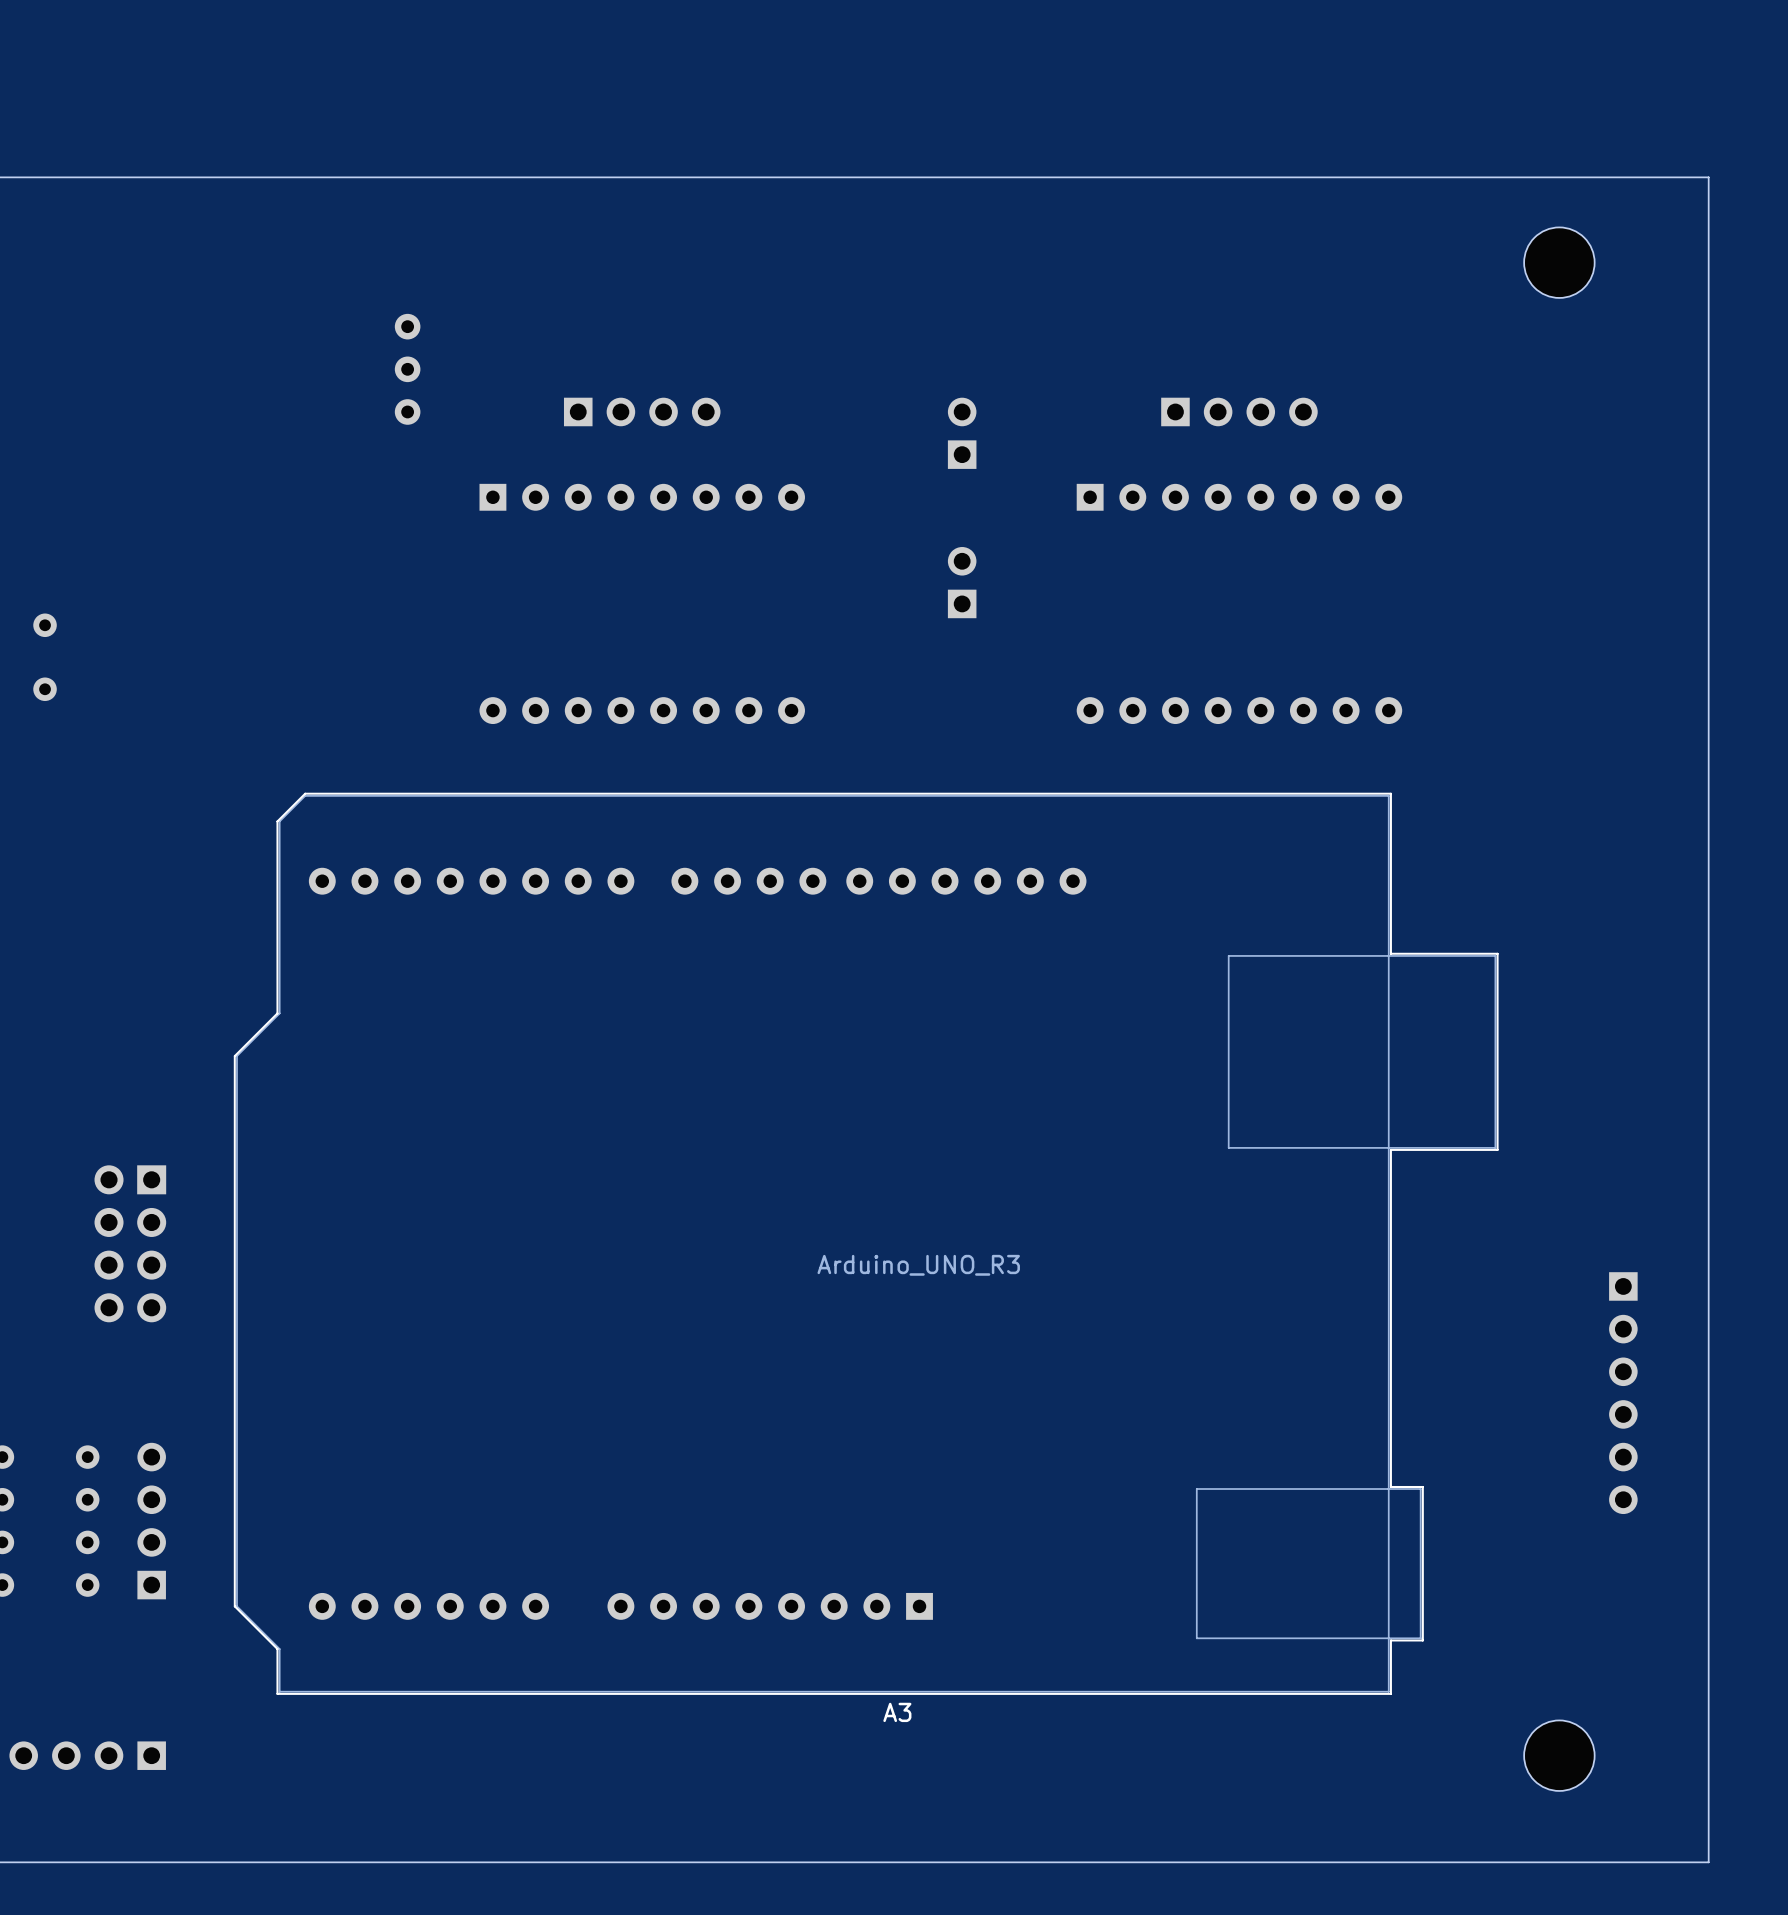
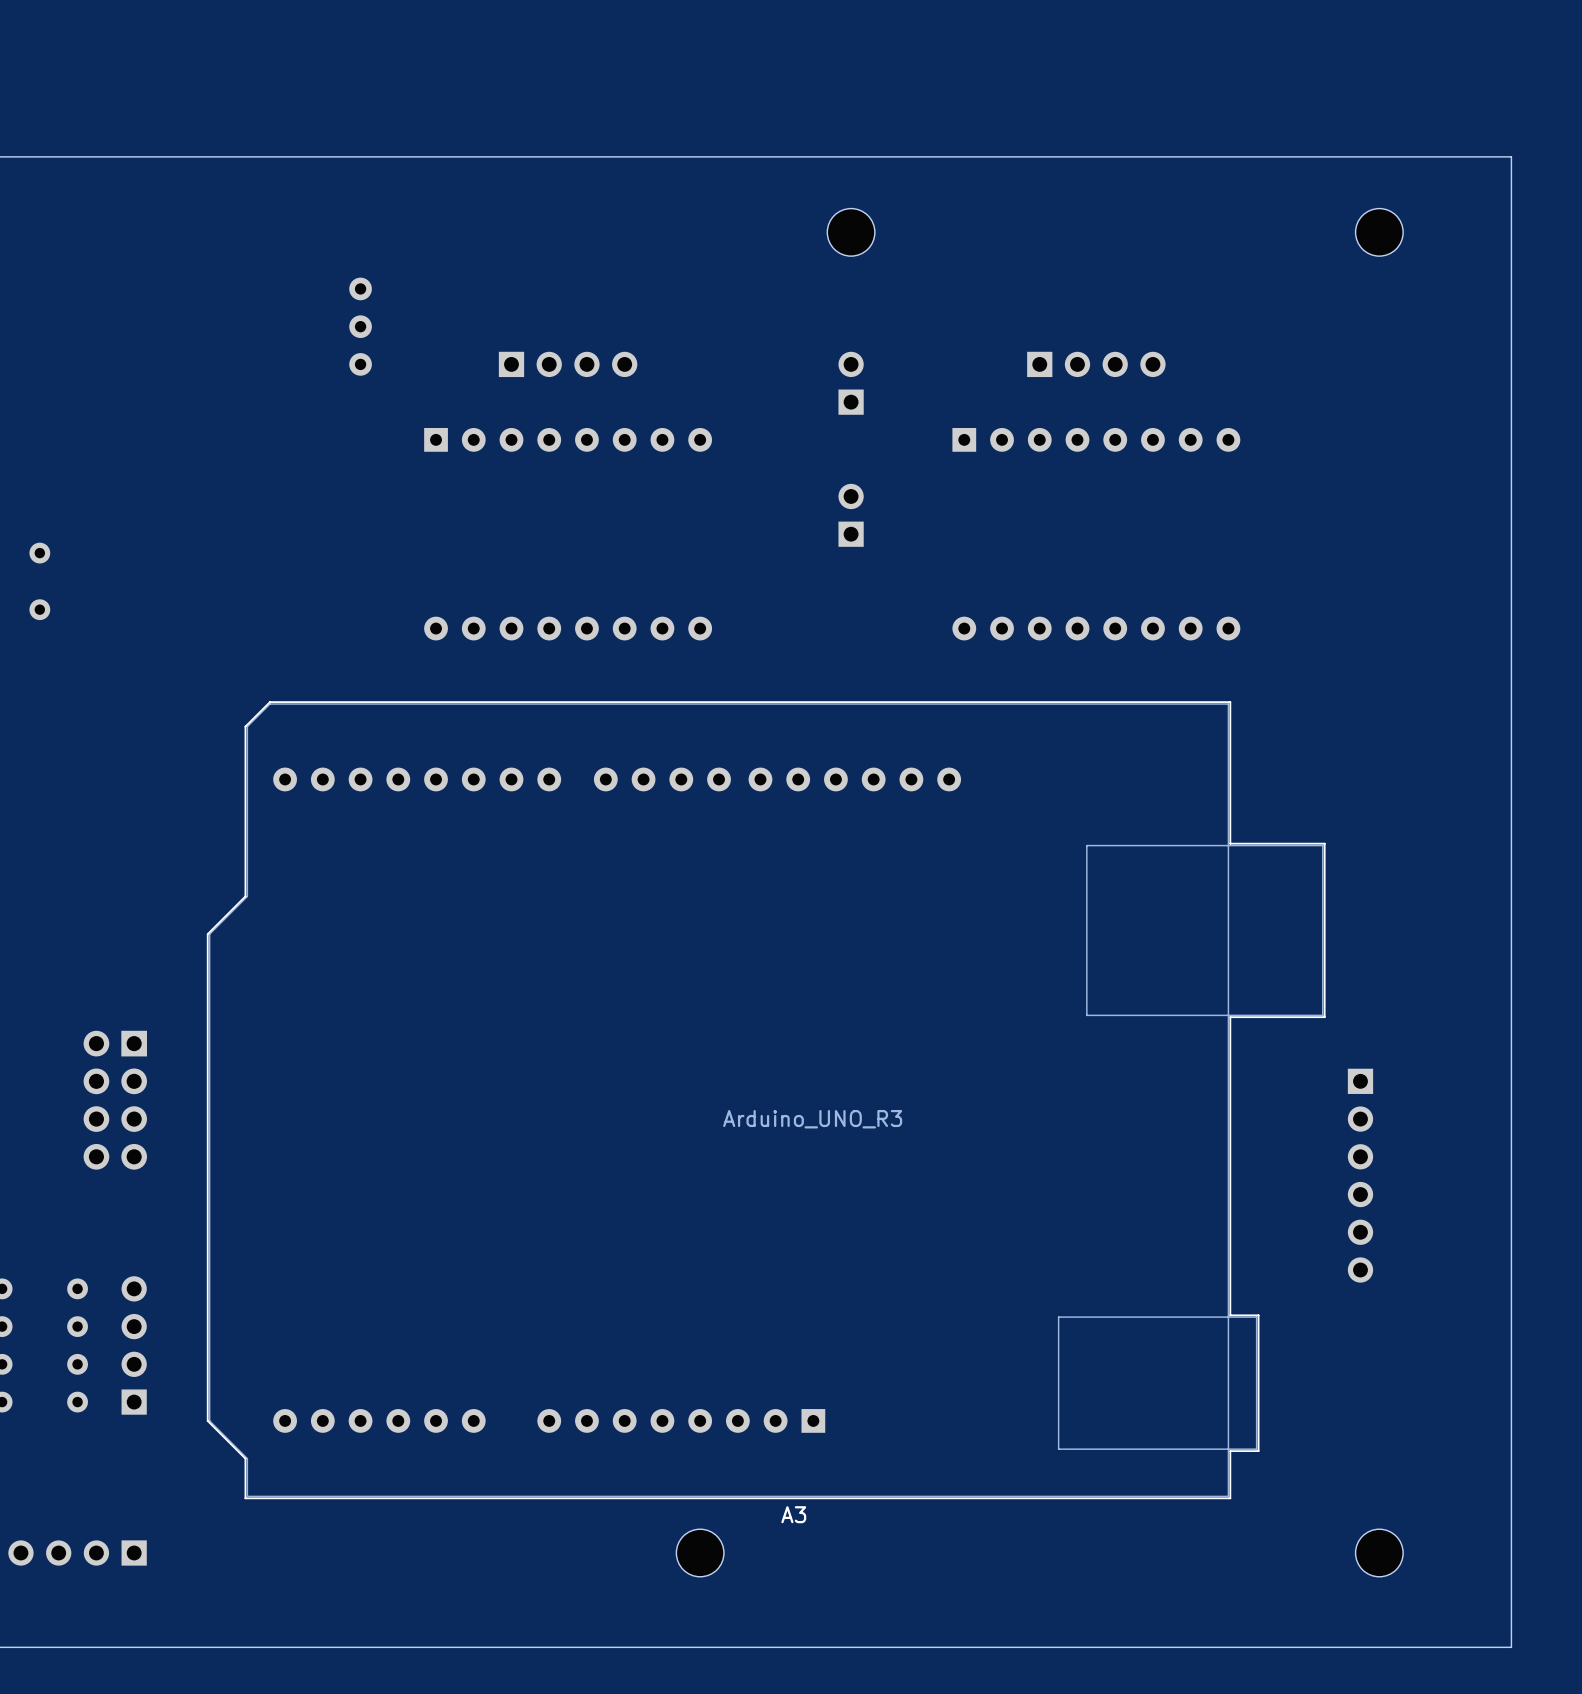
part footprint: [1524, 227, 1595, 298] -> [1355, 208, 1404, 257]
part: none -> (851, 232)
part position: (1623, 1393) -> (1360, 1175)
part footprint: [1524, 1720, 1595, 1791] -> [1355, 1529, 1404, 1577]
part: none -> (700, 1553)

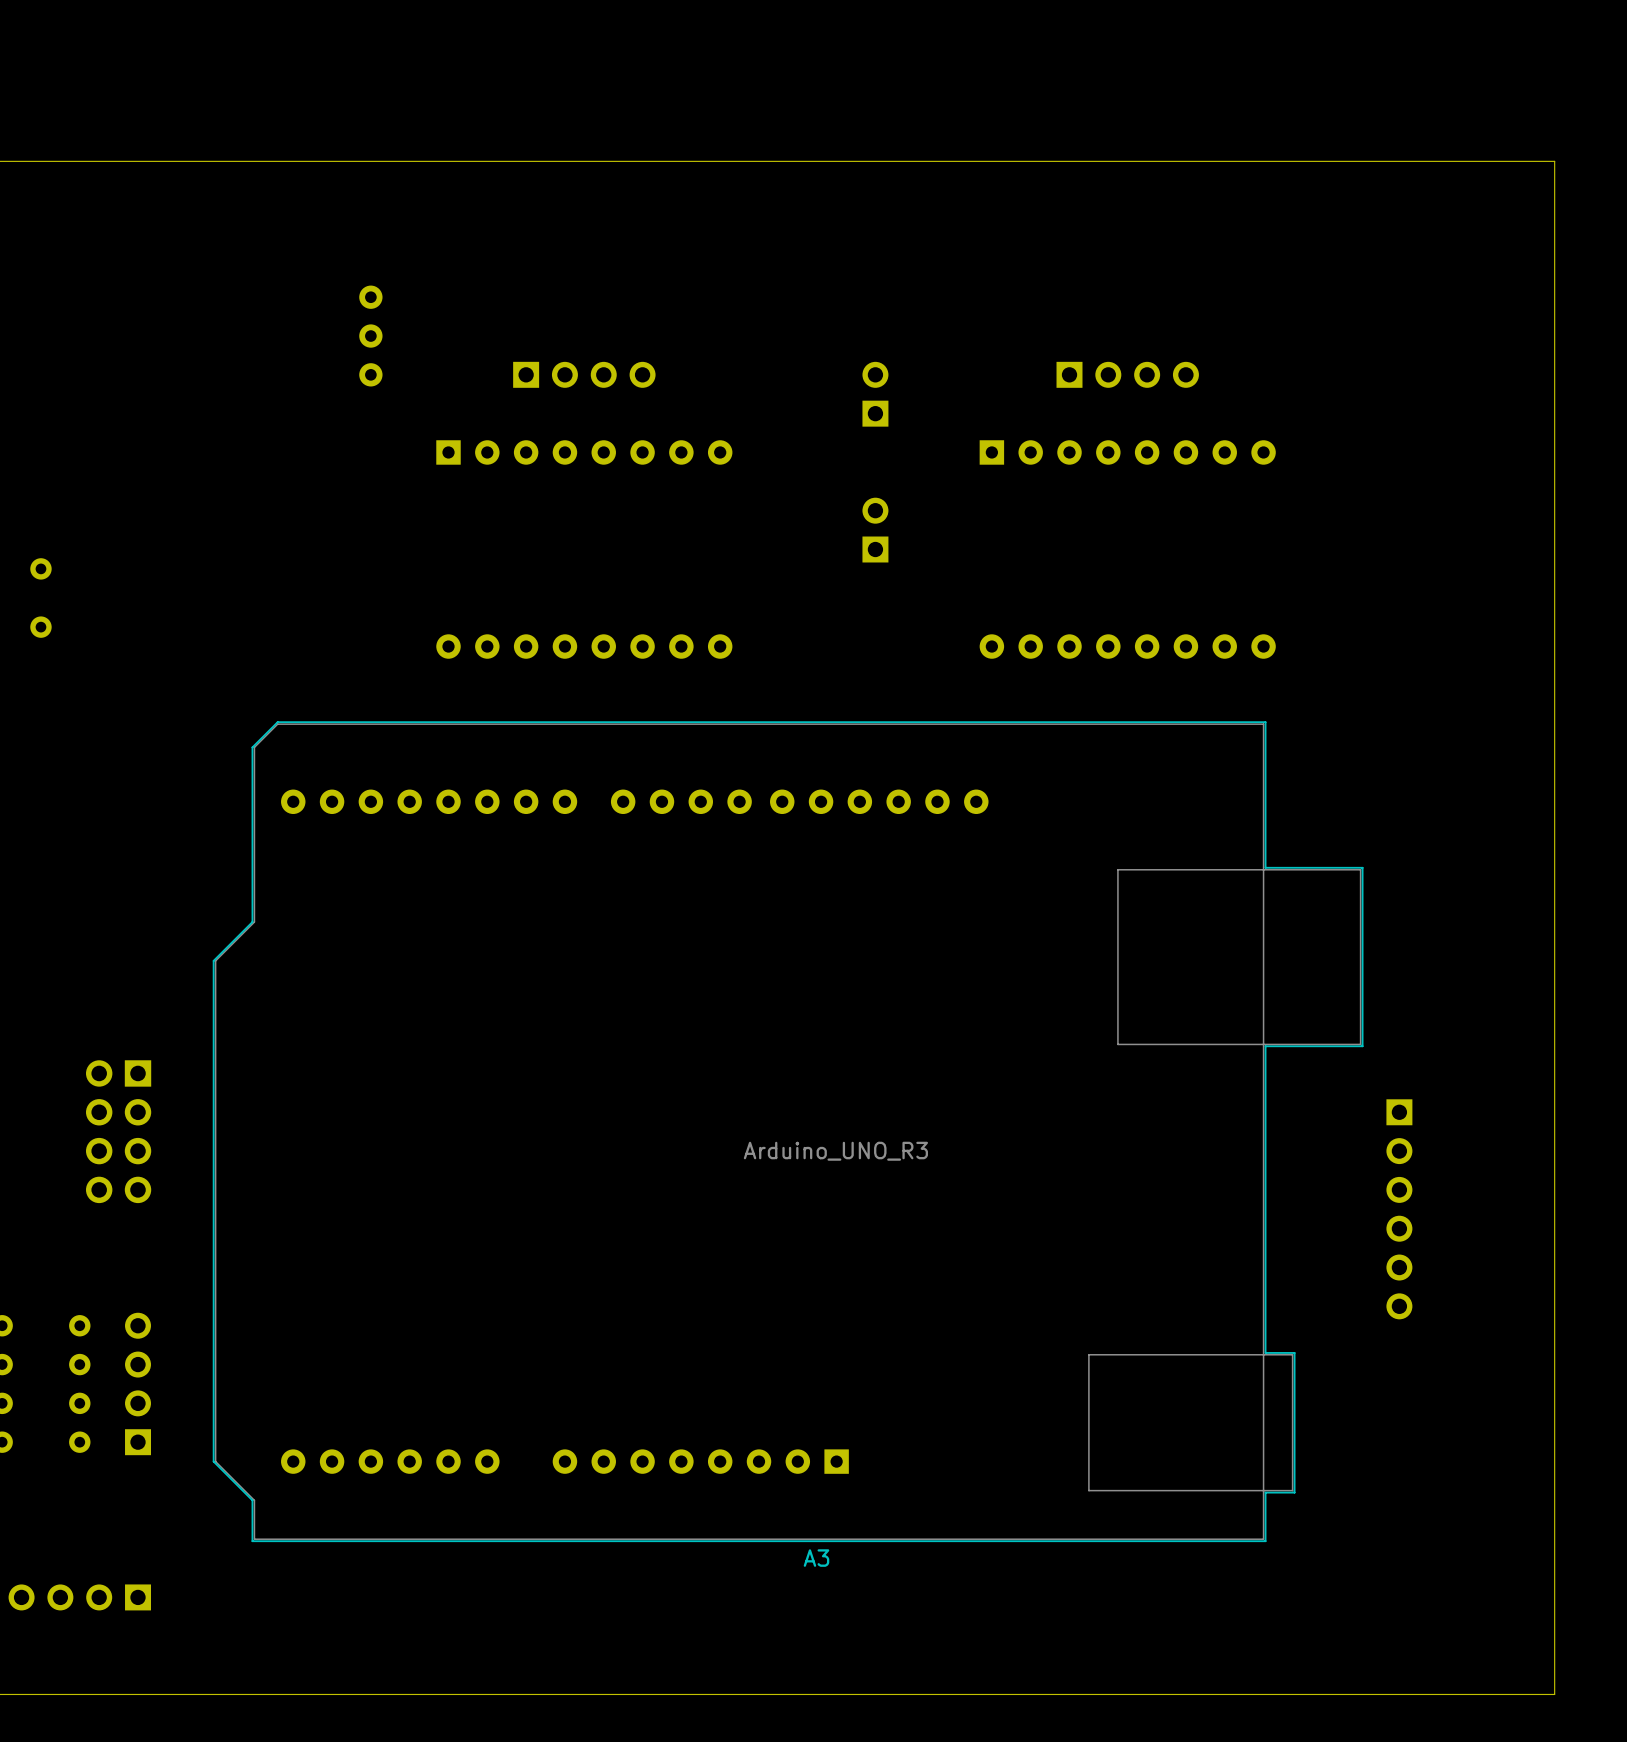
part: (851, 232) -> none
part: (1379, 232) -> none
part: (700, 1553) -> none
part: (1379, 1553) -> none

